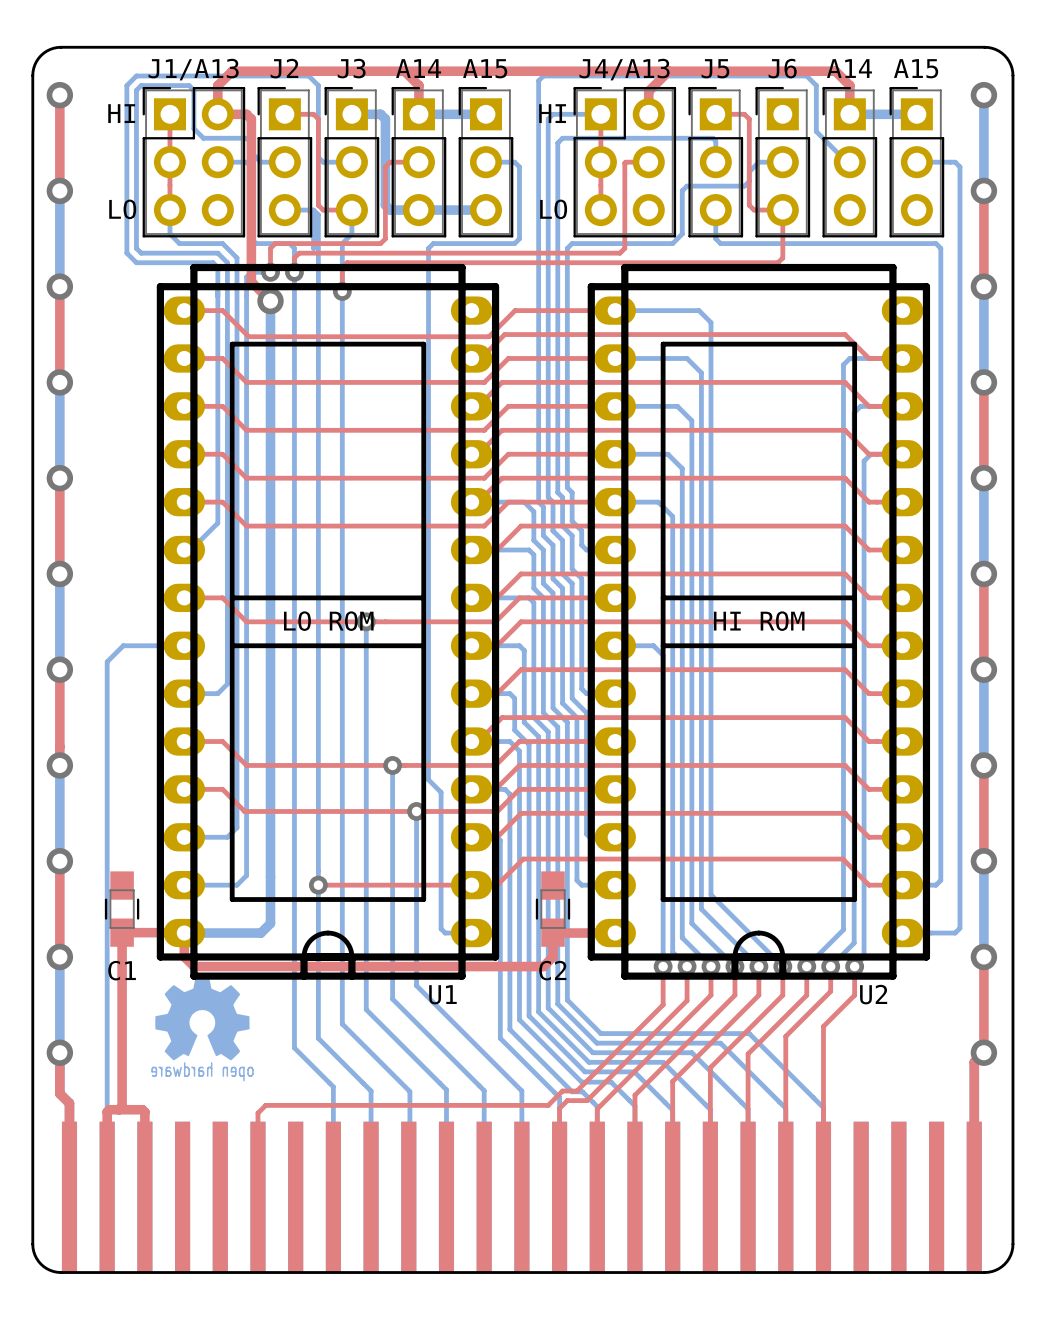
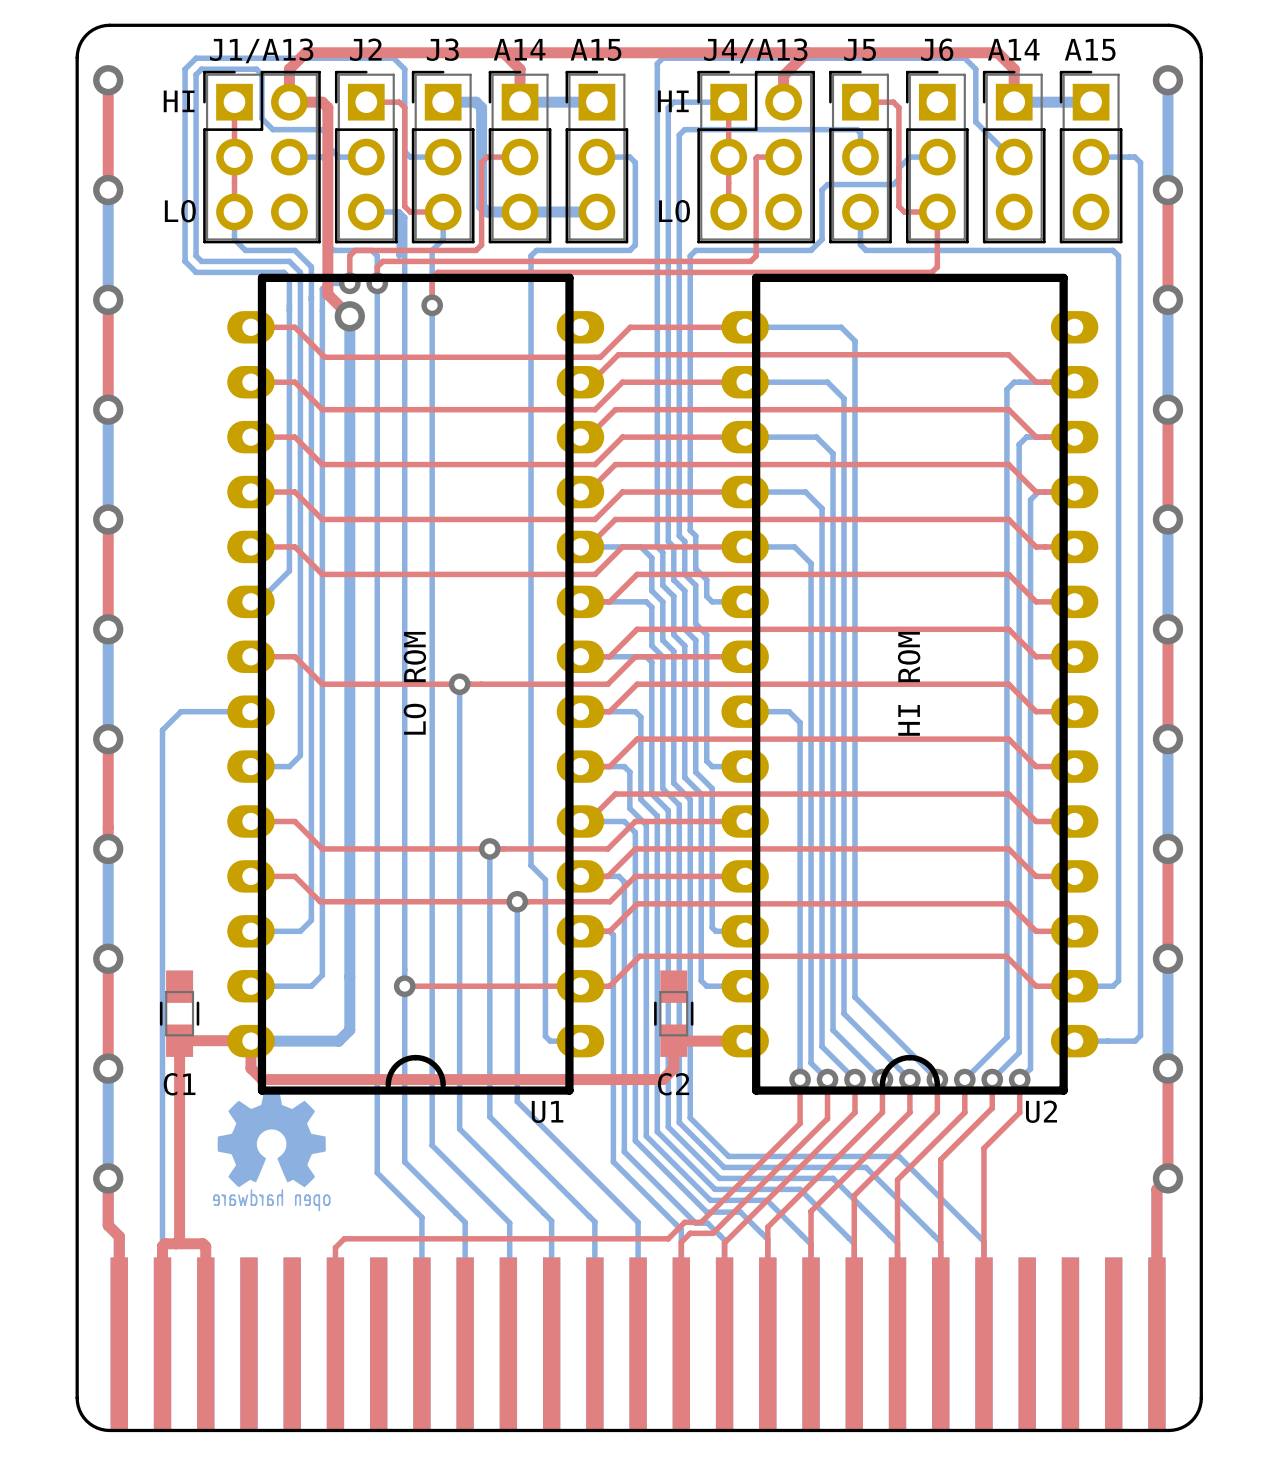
U1 footprint: [156, 263, 500, 980] -> [227, 273, 605, 1095]
U2 footprint: [587, 263, 931, 980] -> [721, 273, 1099, 1095]
text rotation: 0° (328, 621) -> 90° counterclockwise (414, 683)
text rotation: 0° (759, 621) -> 90° counterclockwise (909, 683)

